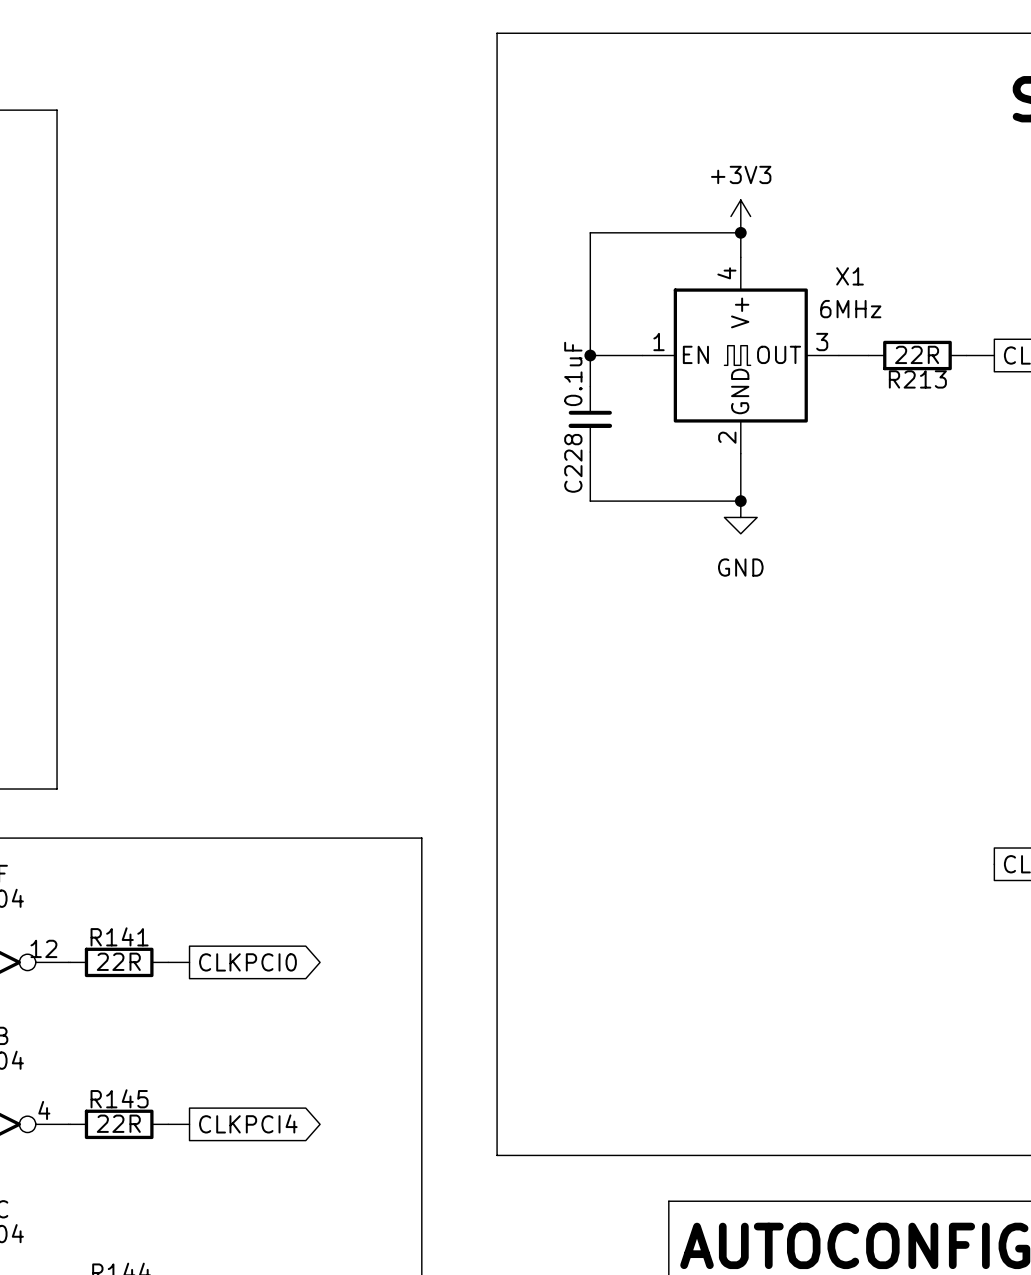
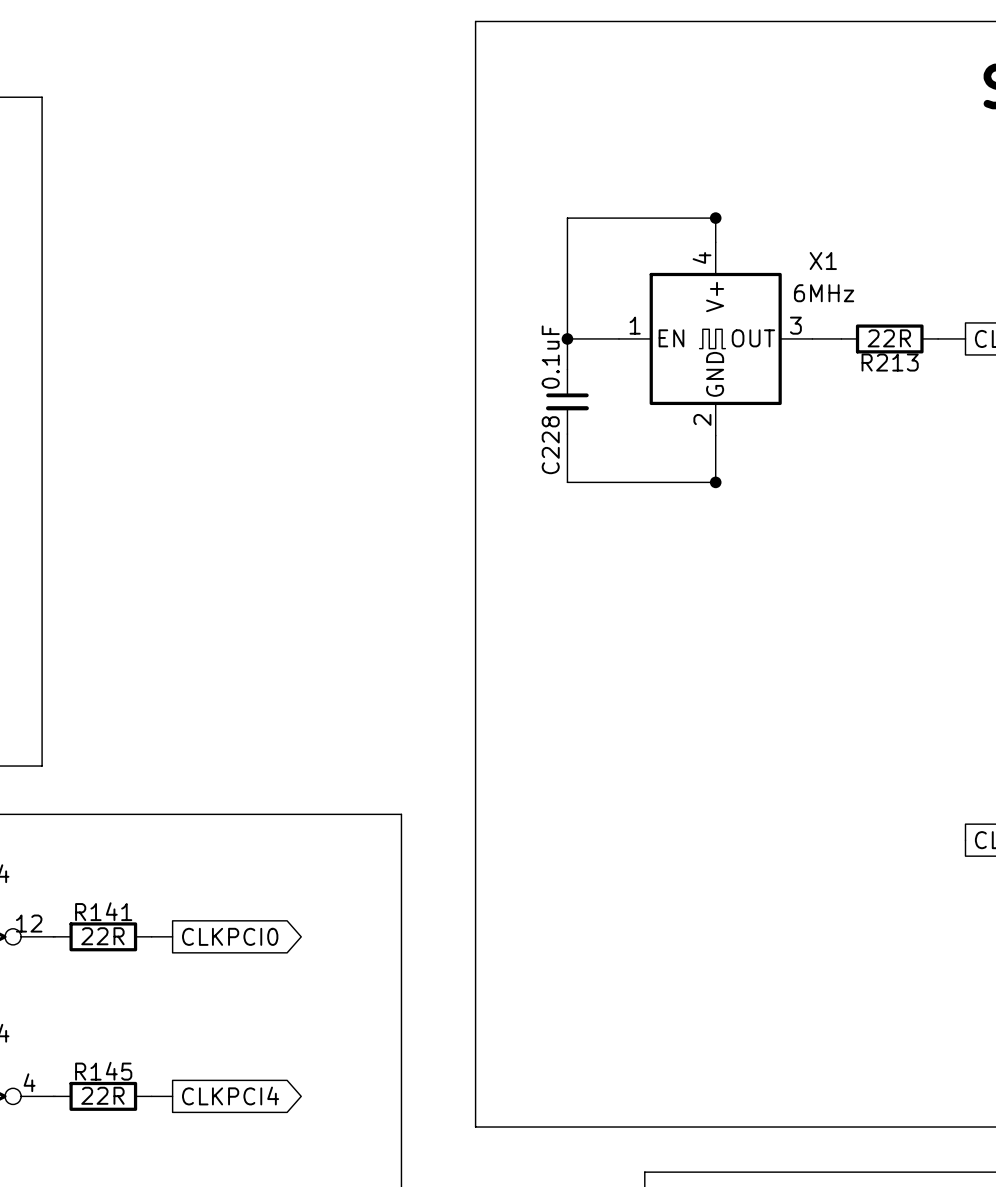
power symbol: +3V3 (740, 216) -> none
power symbol: GND (740, 517) -> none

